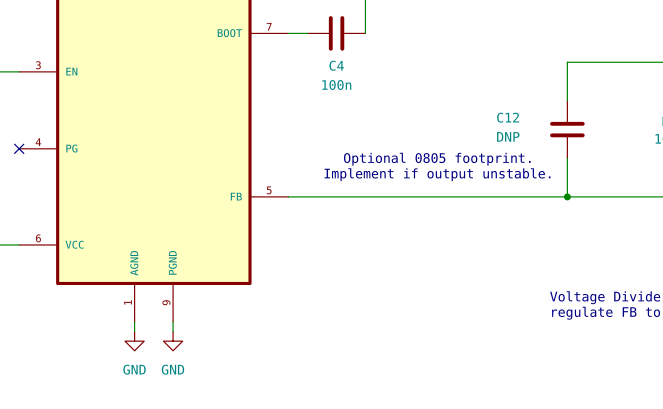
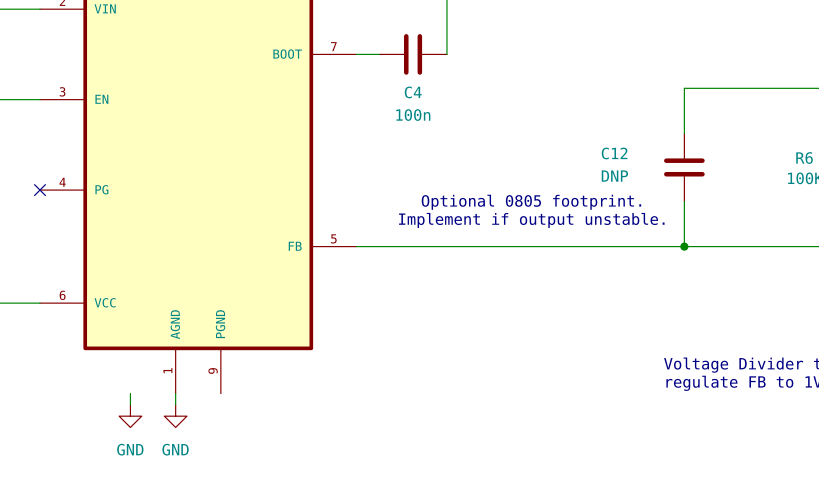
wire: (173, 321) (173, 331) -> (130, 393) (130, 404)
power symbol position: GND (173, 341) -> GND (130, 416)

